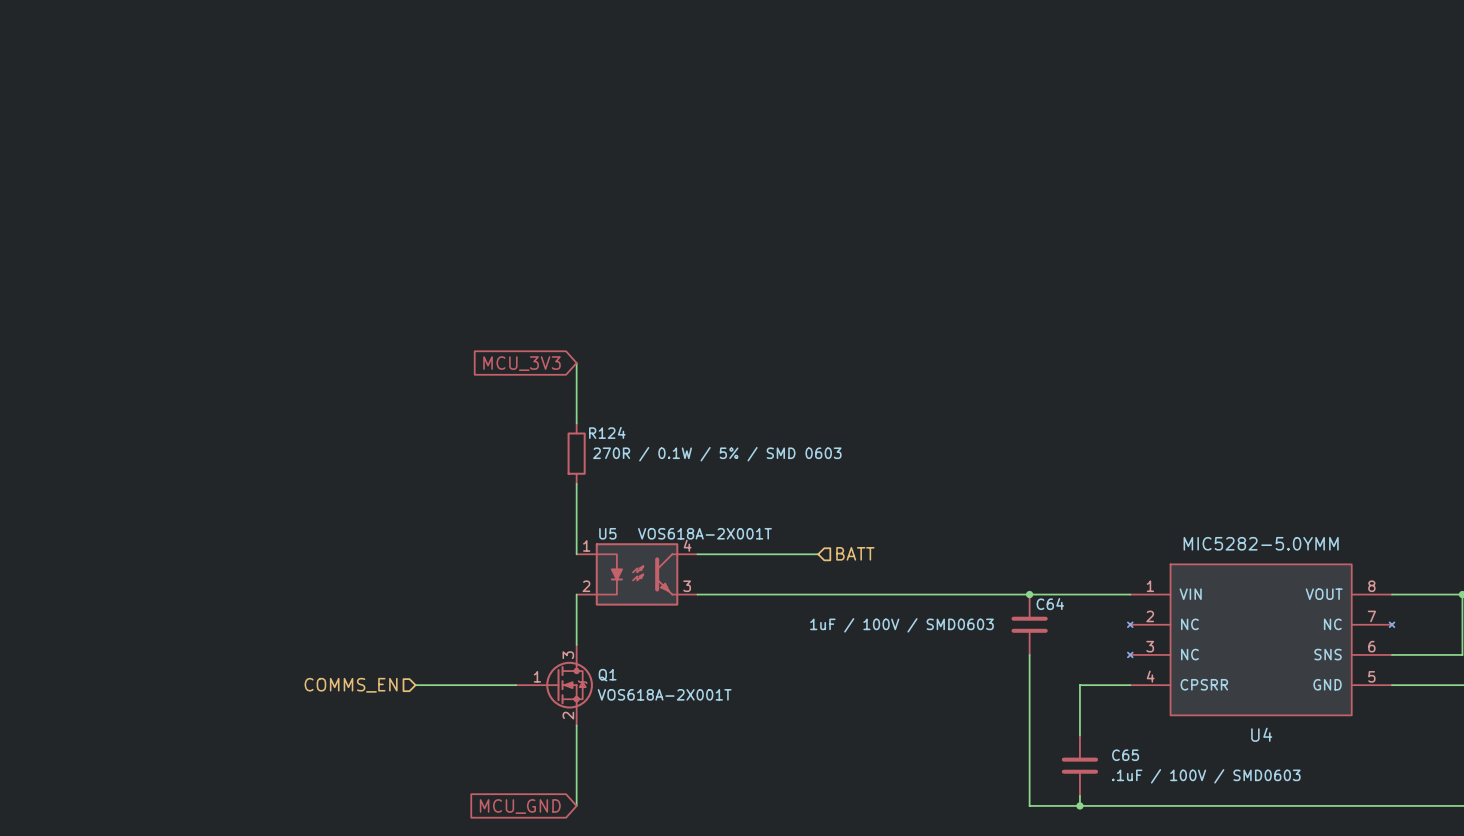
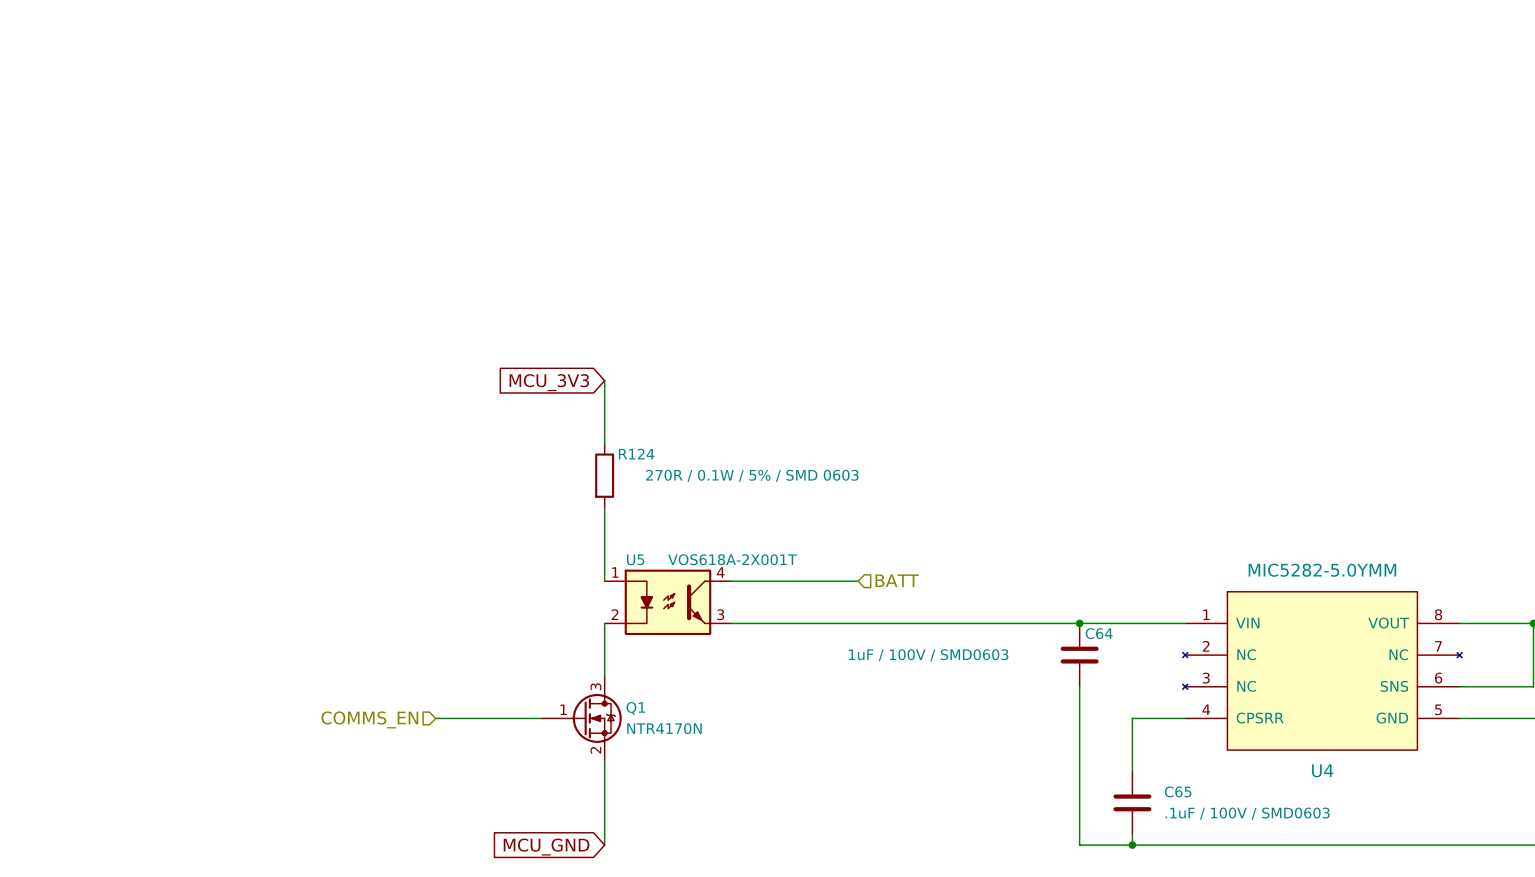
Q1 value: VOS618A-2X001T (664, 694) -> NTR4170N (664, 728)

